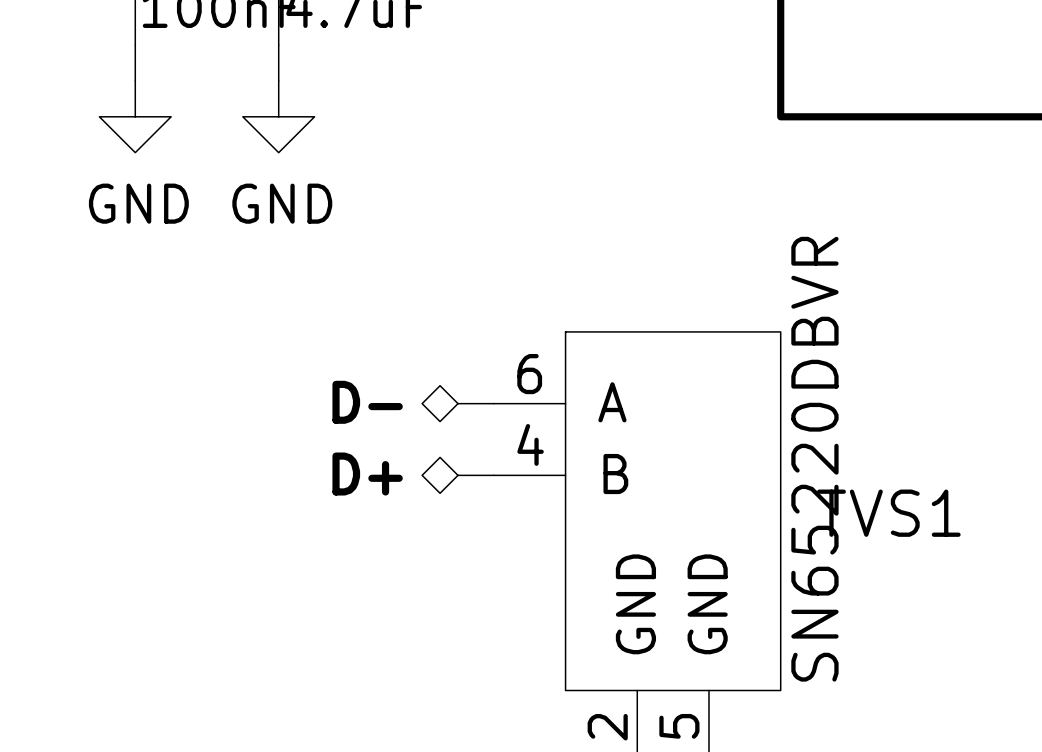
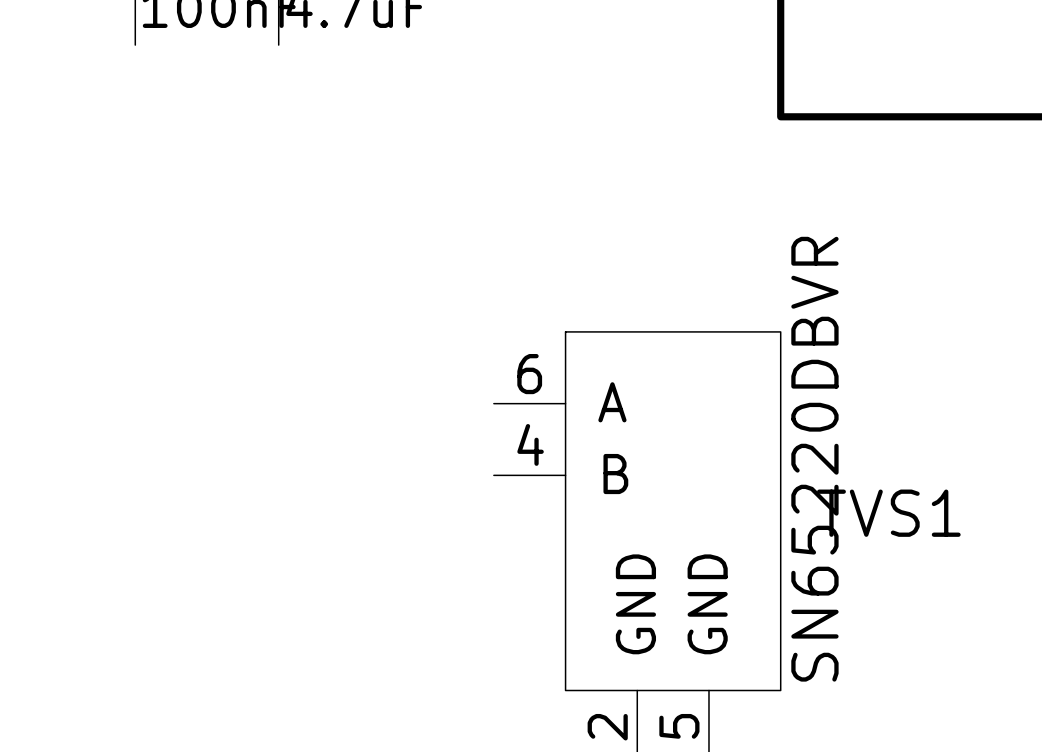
wire: (135, 45) (135, 80) -> none
wire: (278, 45) (278, 80) -> none
power symbol: GND (135, 116) -> none
power symbol: GND (278, 116) -> none
hierarchical label: D- (367, 402) -> none
wire: (457, 403) (493, 403) -> none
hierarchical label: D+ (367, 474) -> none
wire: (457, 475) (493, 475) -> none

